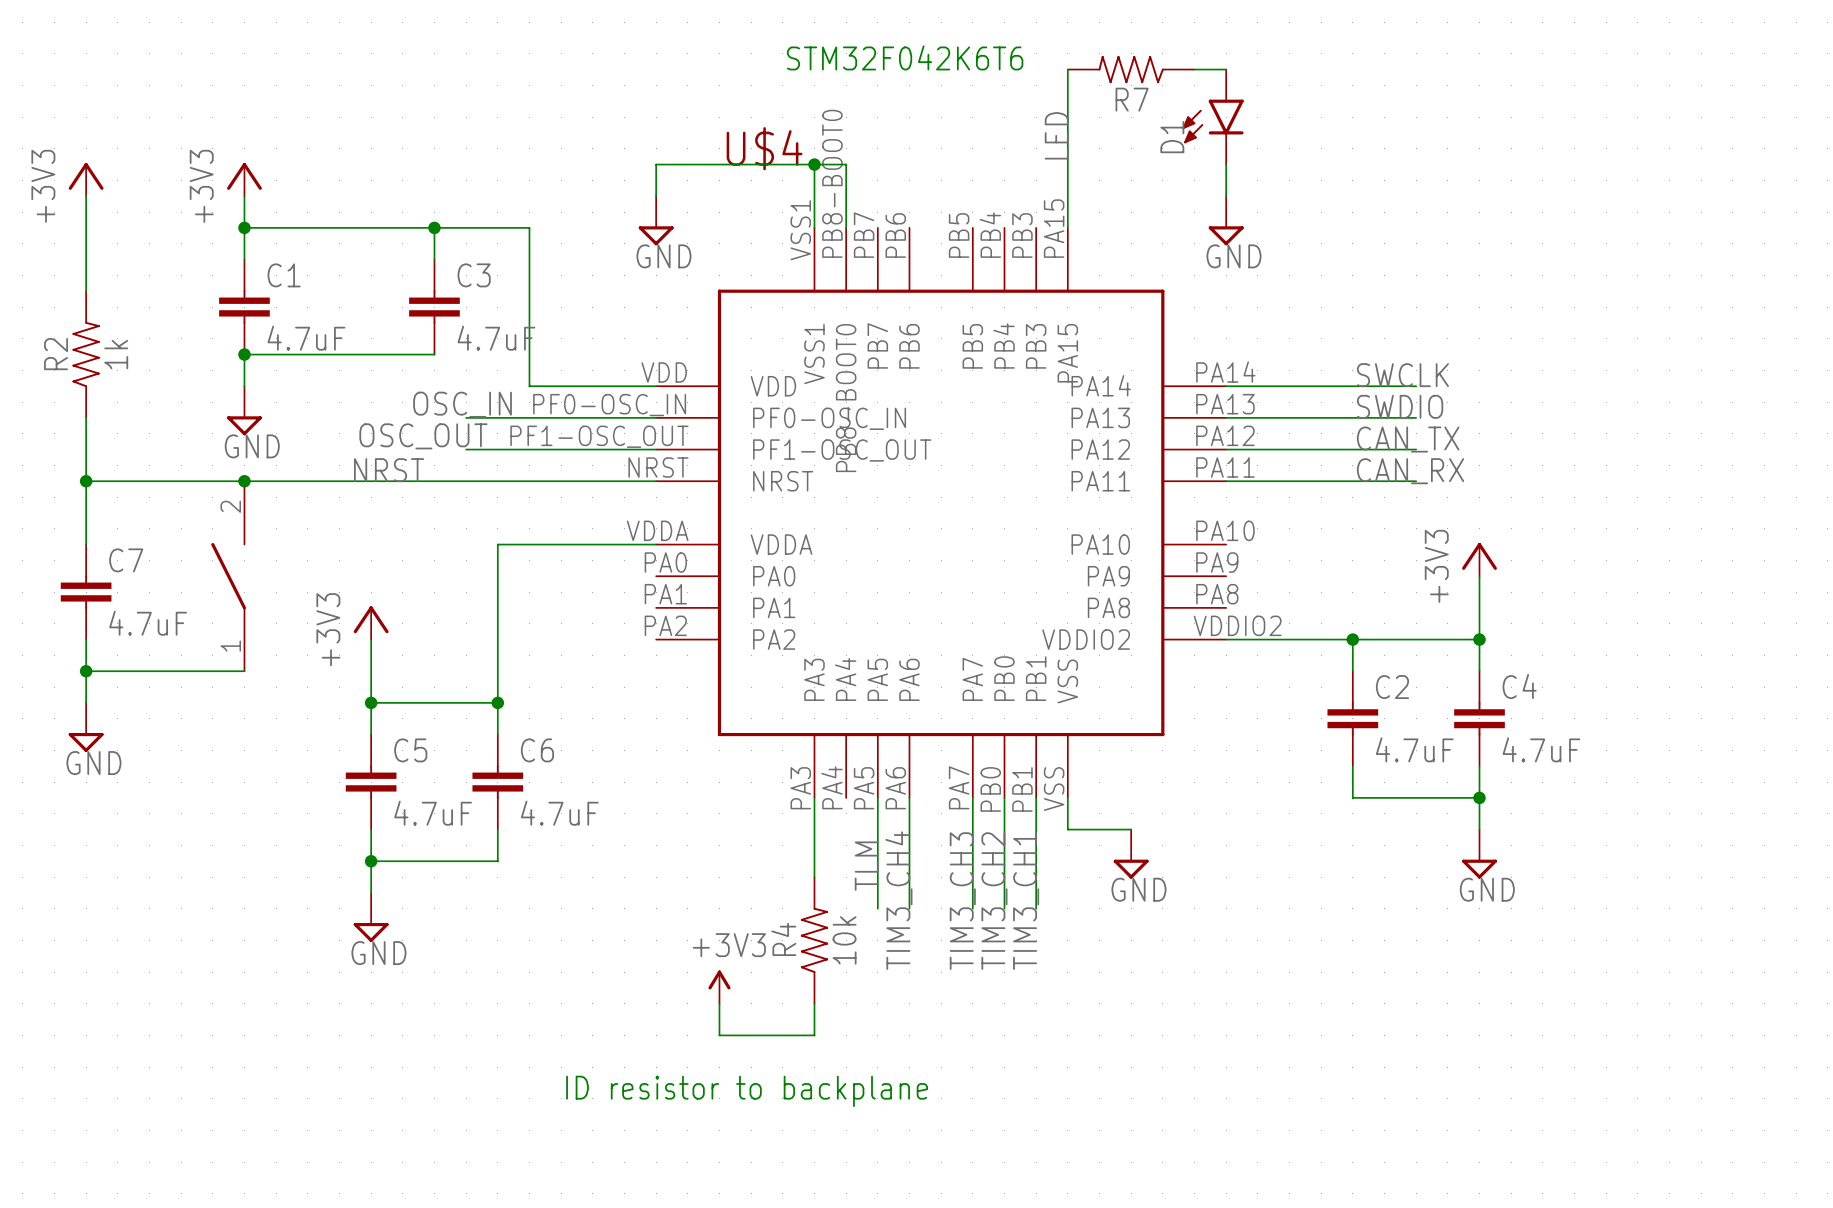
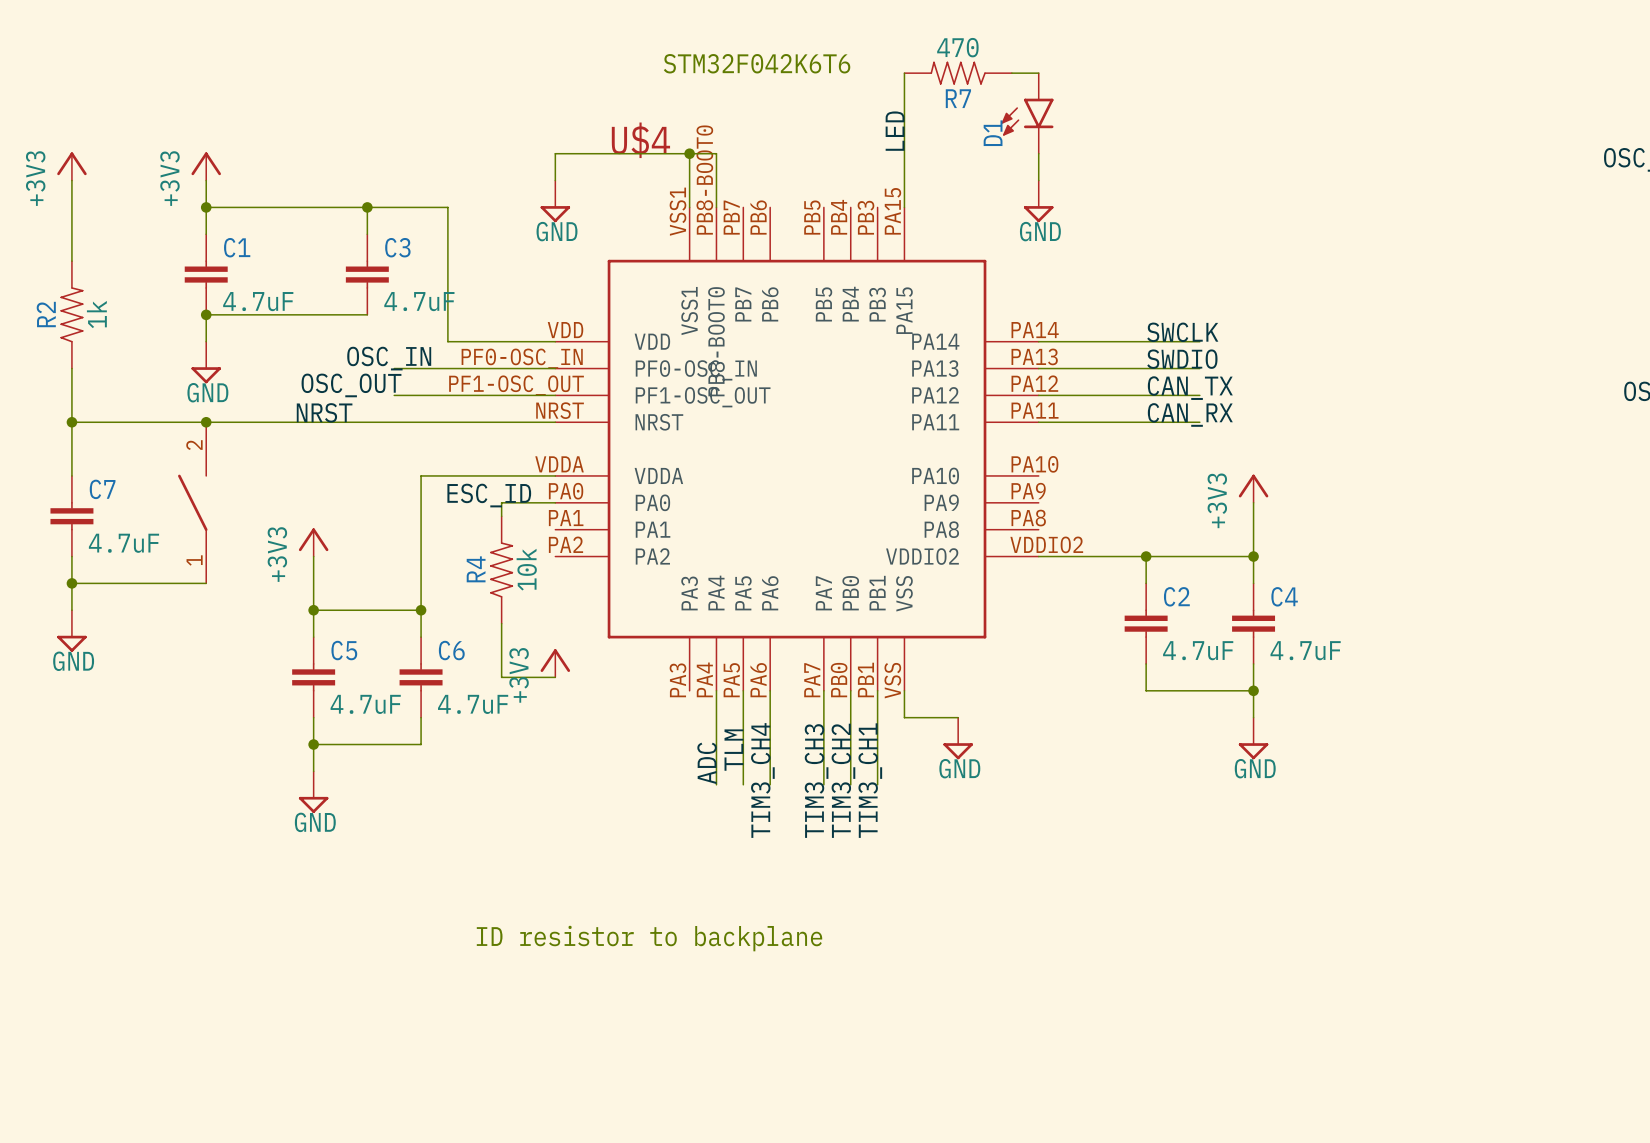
R7 value: none -> 470 (957, 47)
label: none -> ESC_ID (489, 495)
wire: none -> (555, 502) (501, 502) (501, 516)
wire: none -> (501, 623) (501, 677) (555, 677)
power symbol: none -> +3V3 (555, 663)
wire: (814, 797) (814, 877) -> none
wire: none -> (716, 690) (716, 784)
label: none -> ADC (707, 763)
R4 position: (814, 940) -> (501, 569)
label: +3V3 (729, 945) -> none
power symbol: (719, 987) -> none
wire: (719, 1003) (719, 1035) (814, 1035) (814, 1003) -> none

